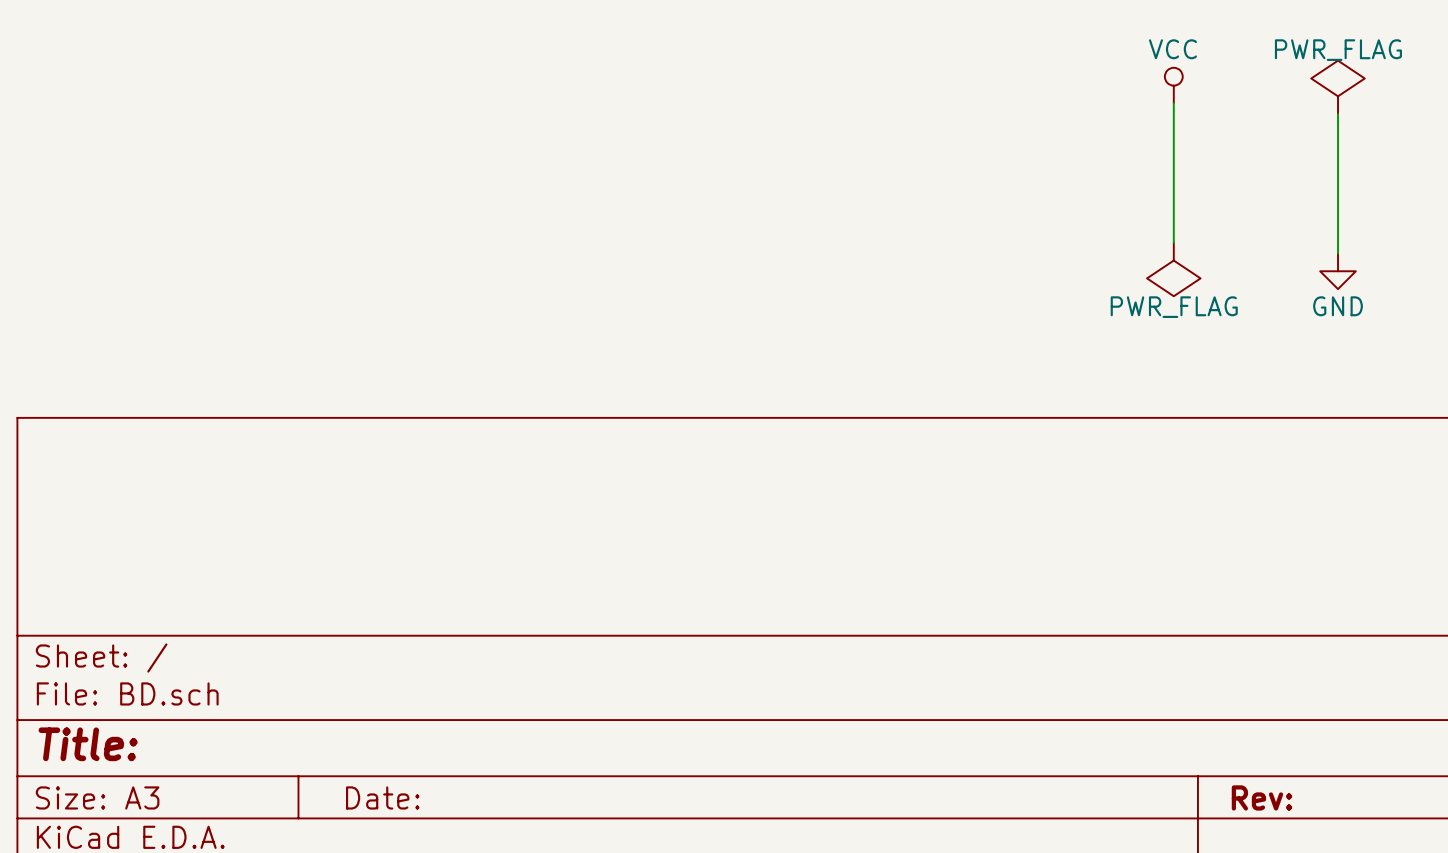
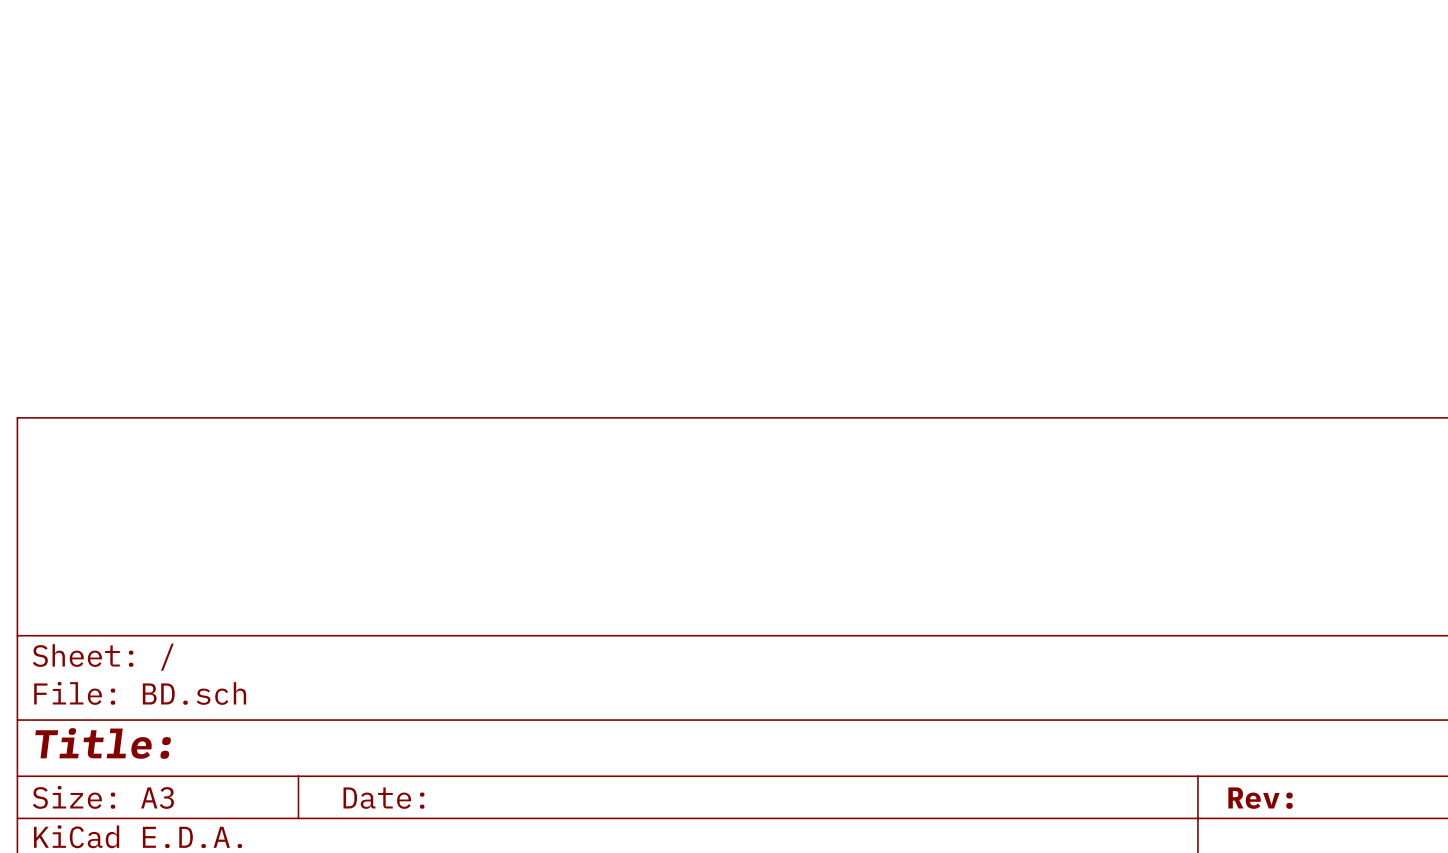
power symbol: VCC (1173, 85) -> none
power symbol: PWR_FLAG (1338, 87) -> none
wire: (1173, 103) (1173, 242) -> none
wire: (1338, 114) (1338, 253) -> none
power symbol: PWR_FLAG (1173, 269) -> none
power symbol: GND (1338, 271) -> none

